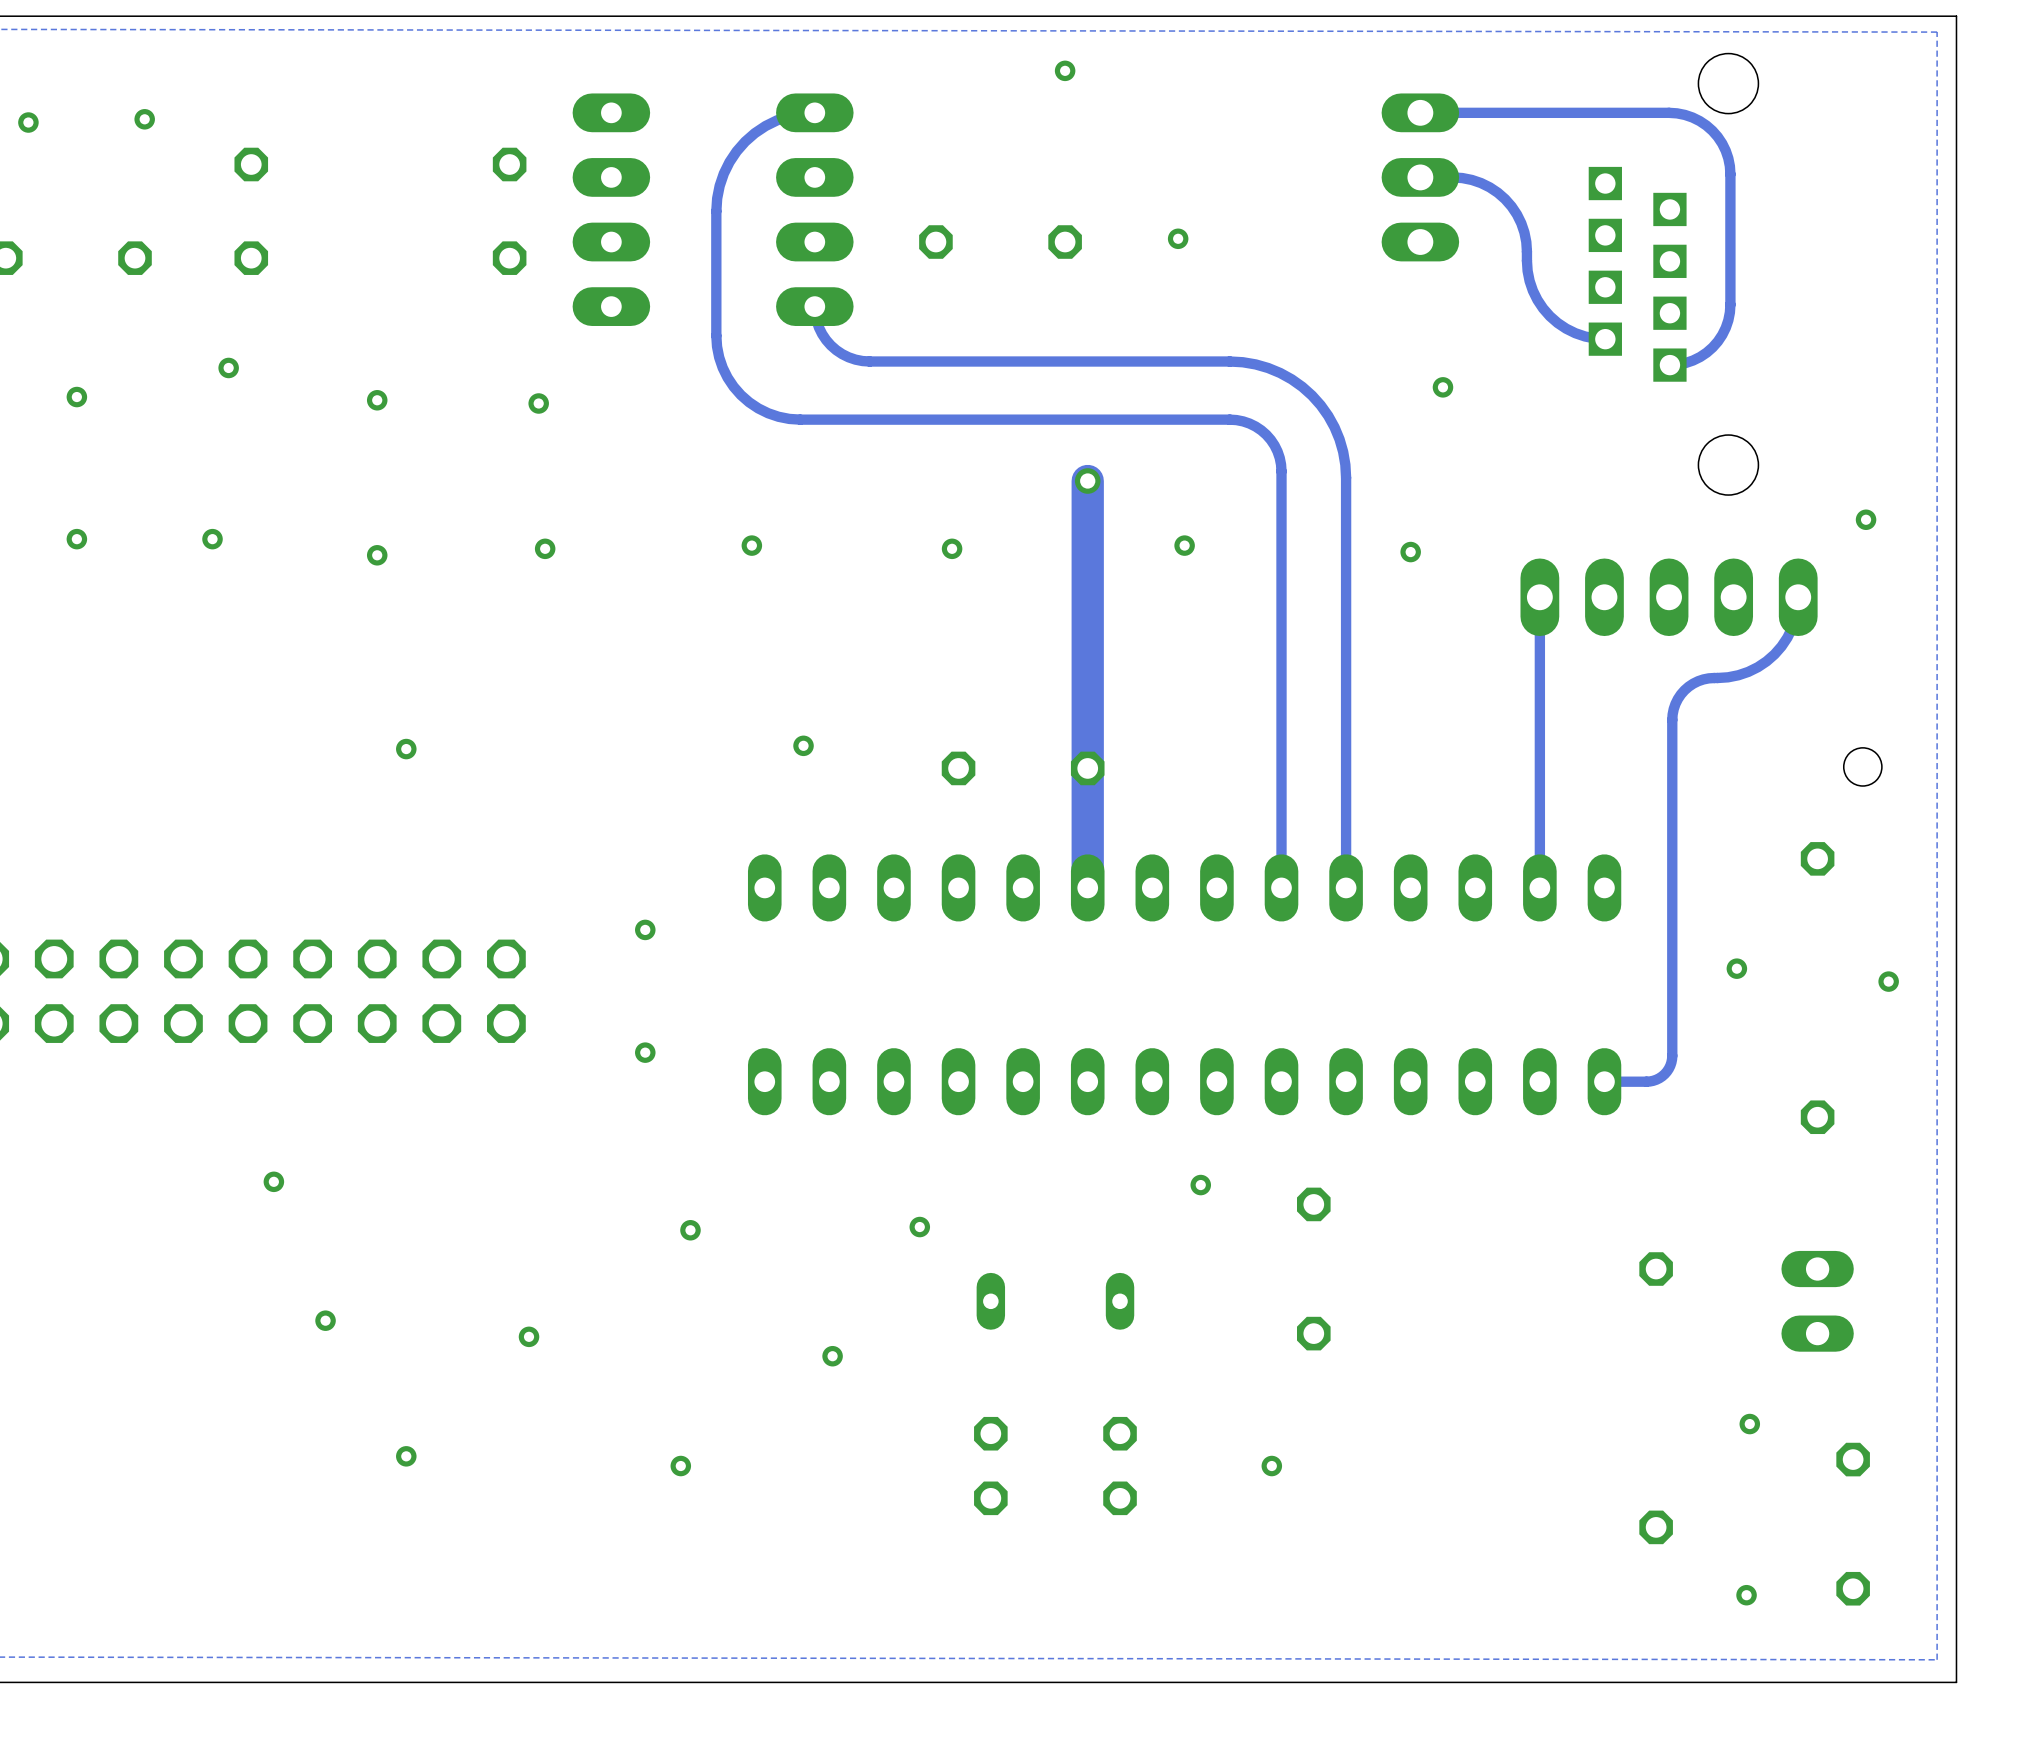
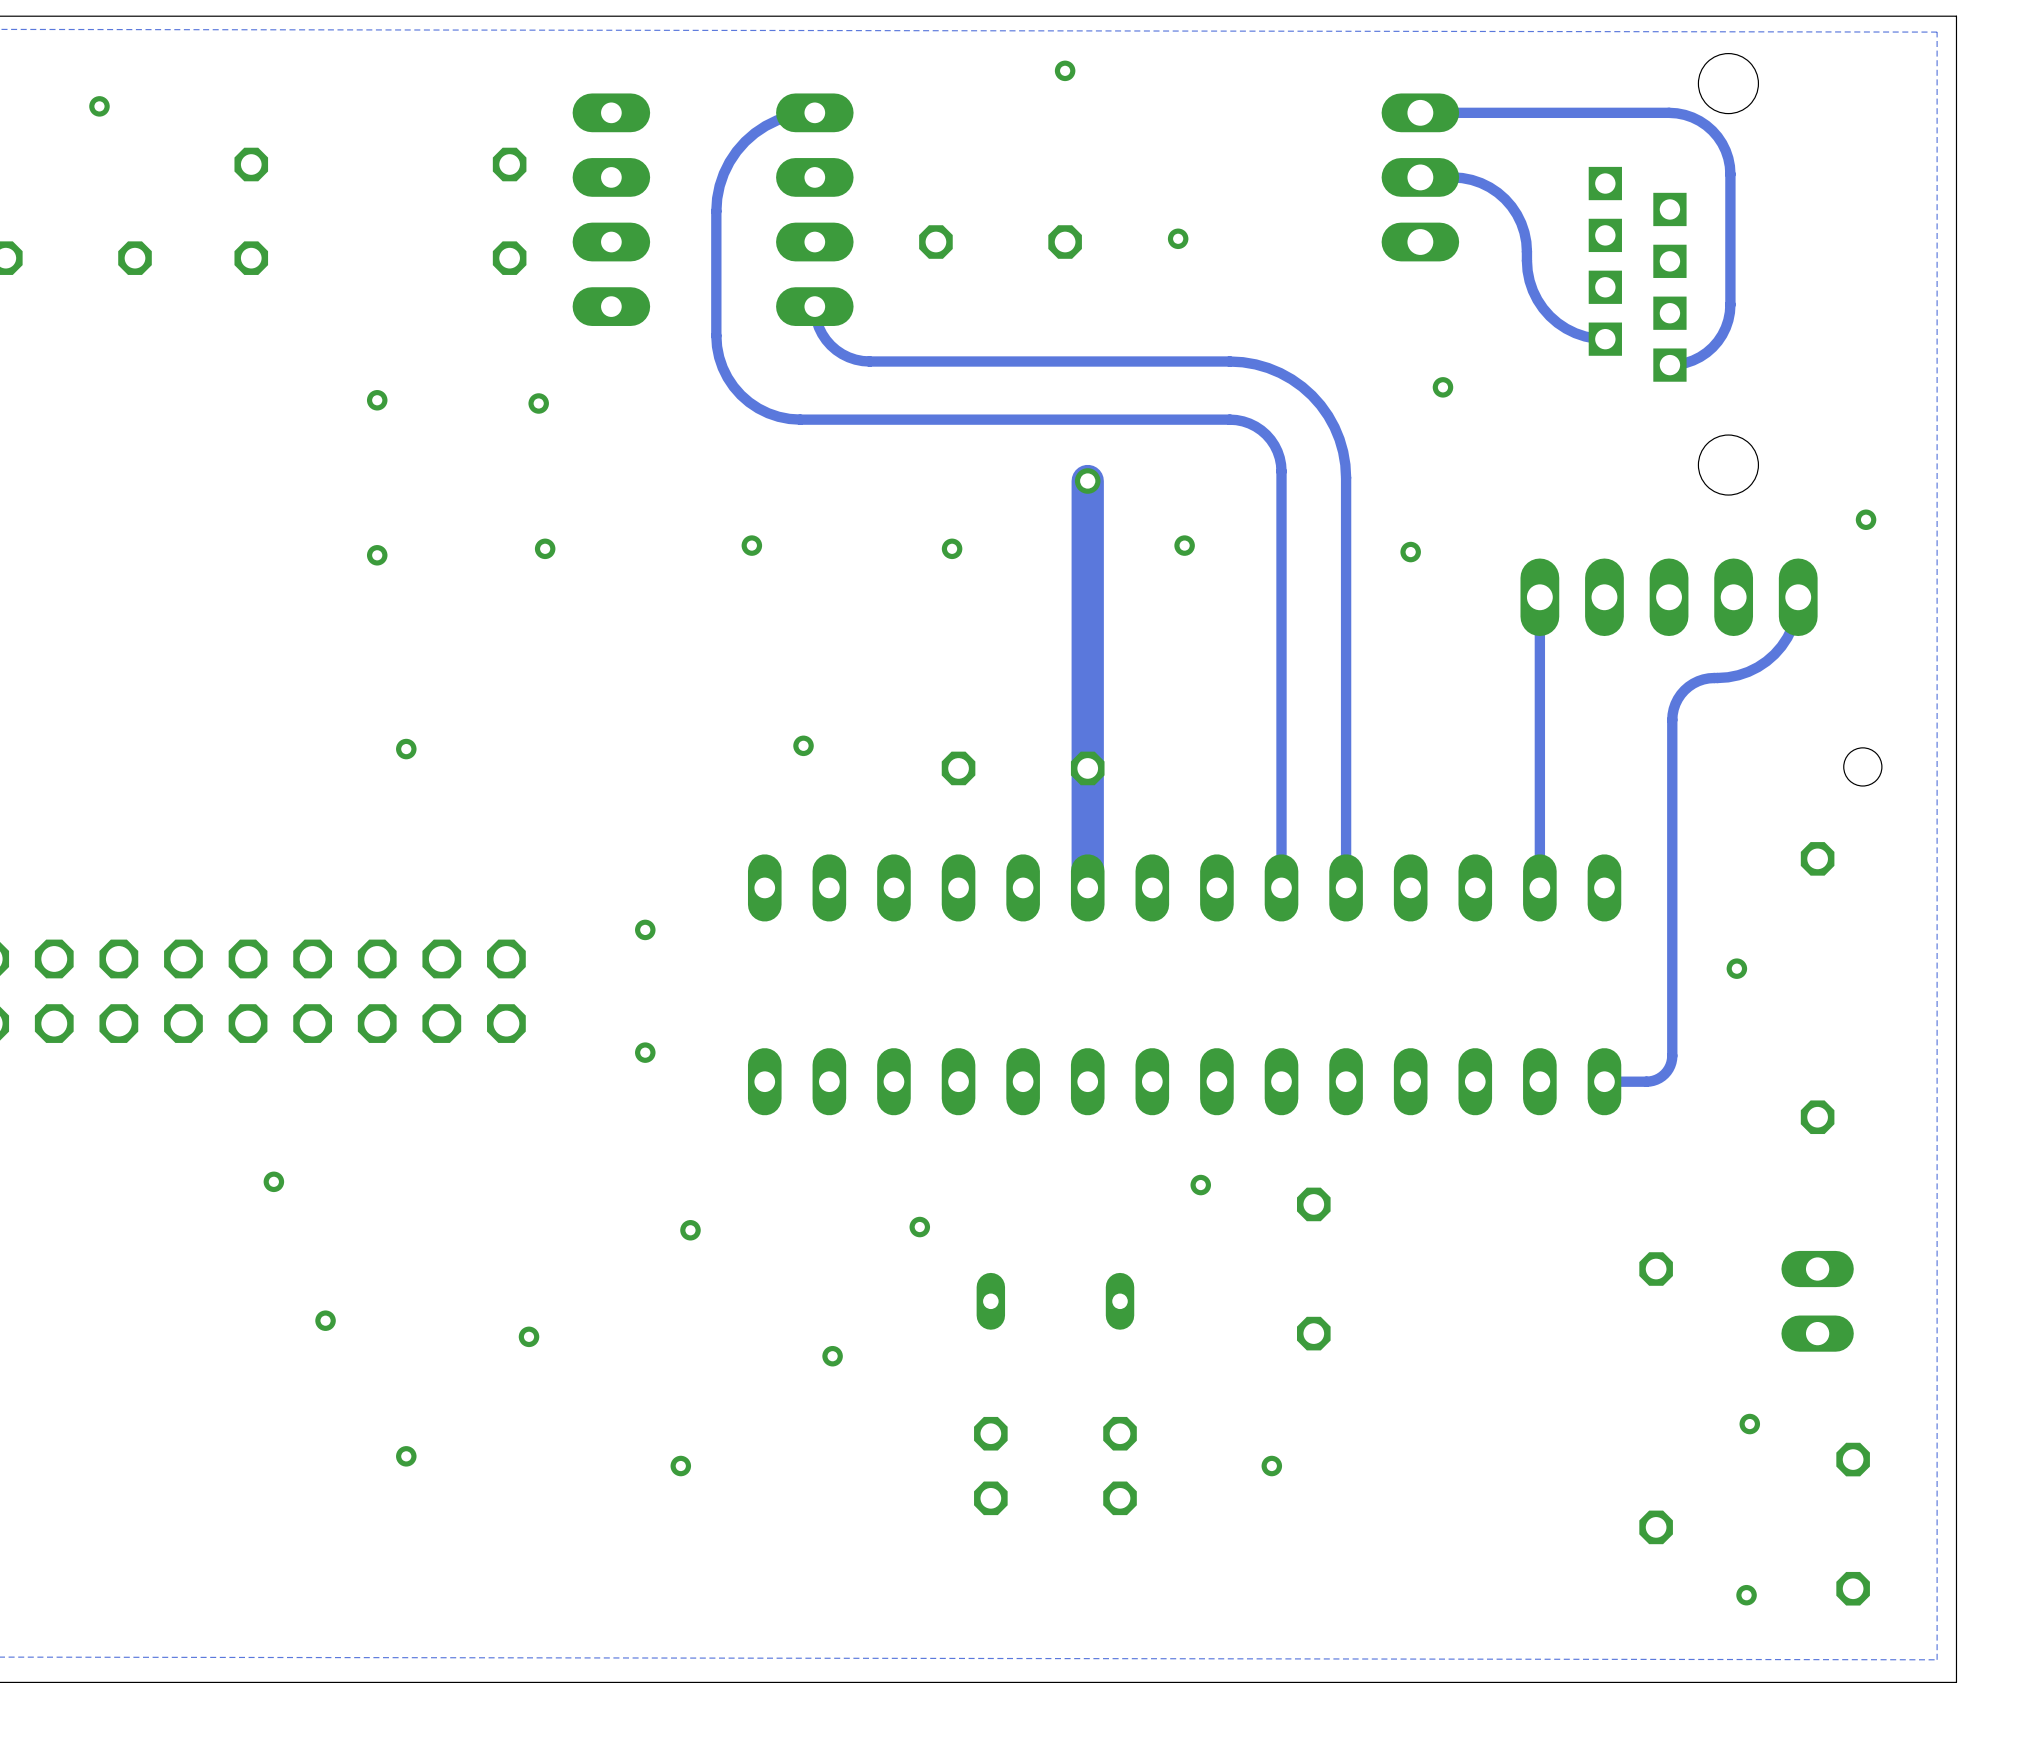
via: none -> (99, 106)
via: (144, 119) -> none
via: (28, 122) -> none
via: (228, 367) -> none
via: (76, 397) -> none
via: (76, 539) -> none
via: (212, 539) -> none
via: (1888, 981) -> none

